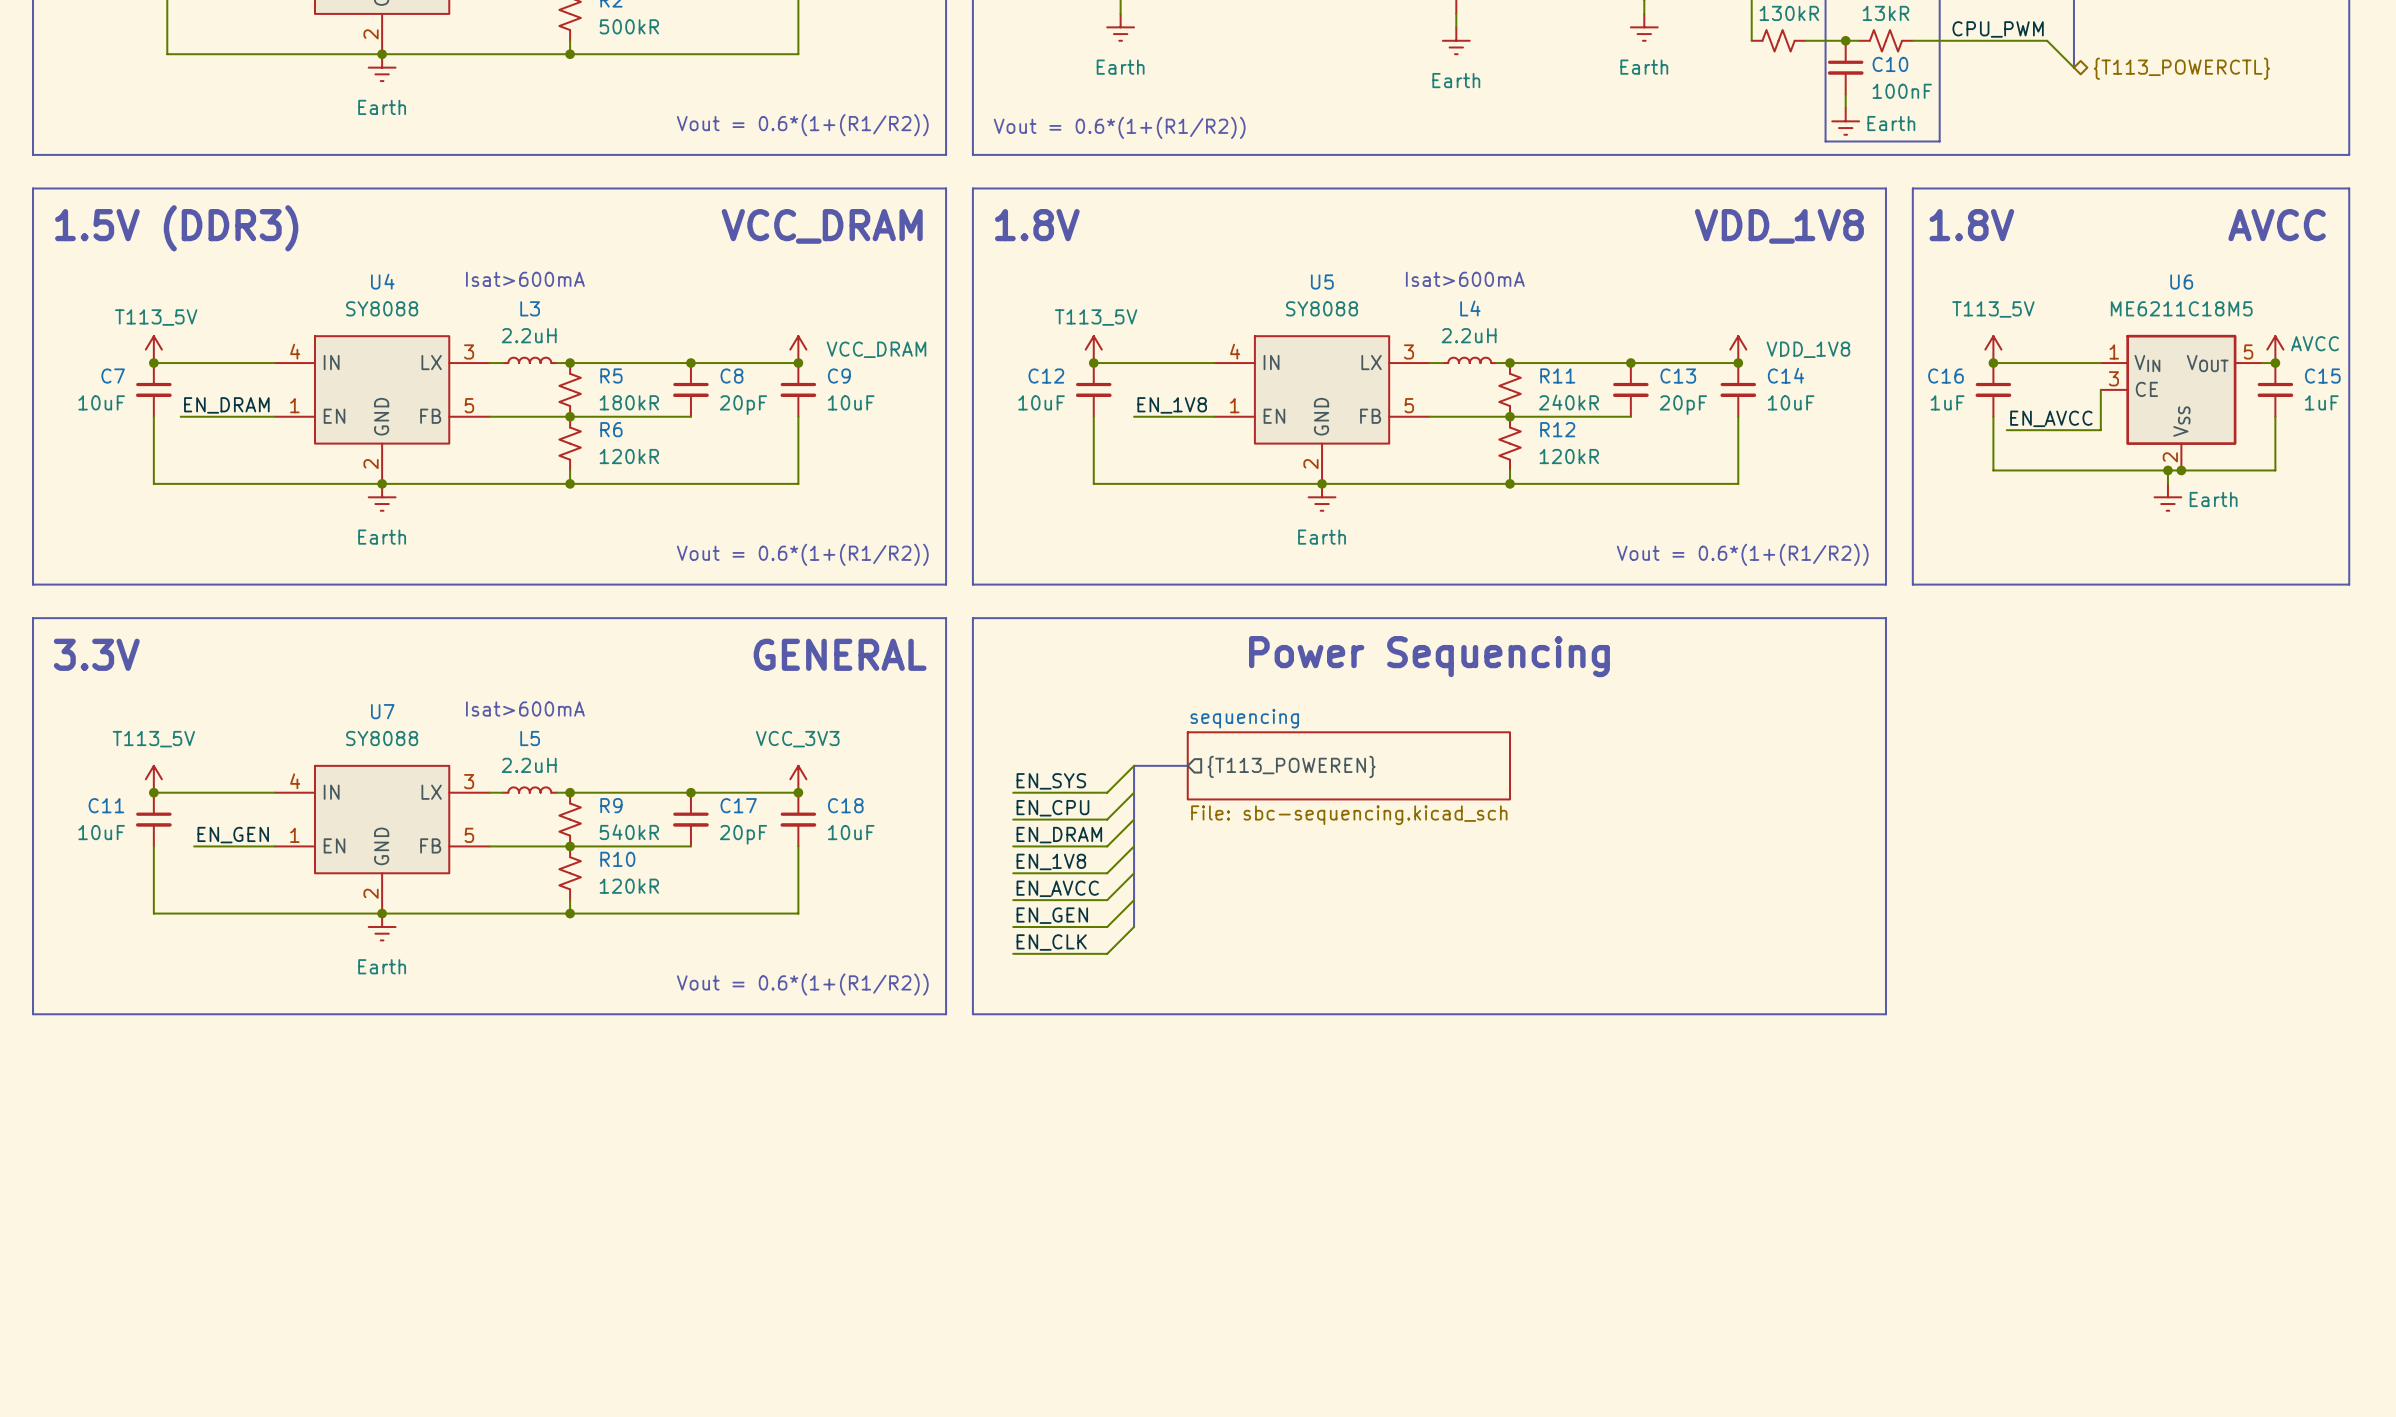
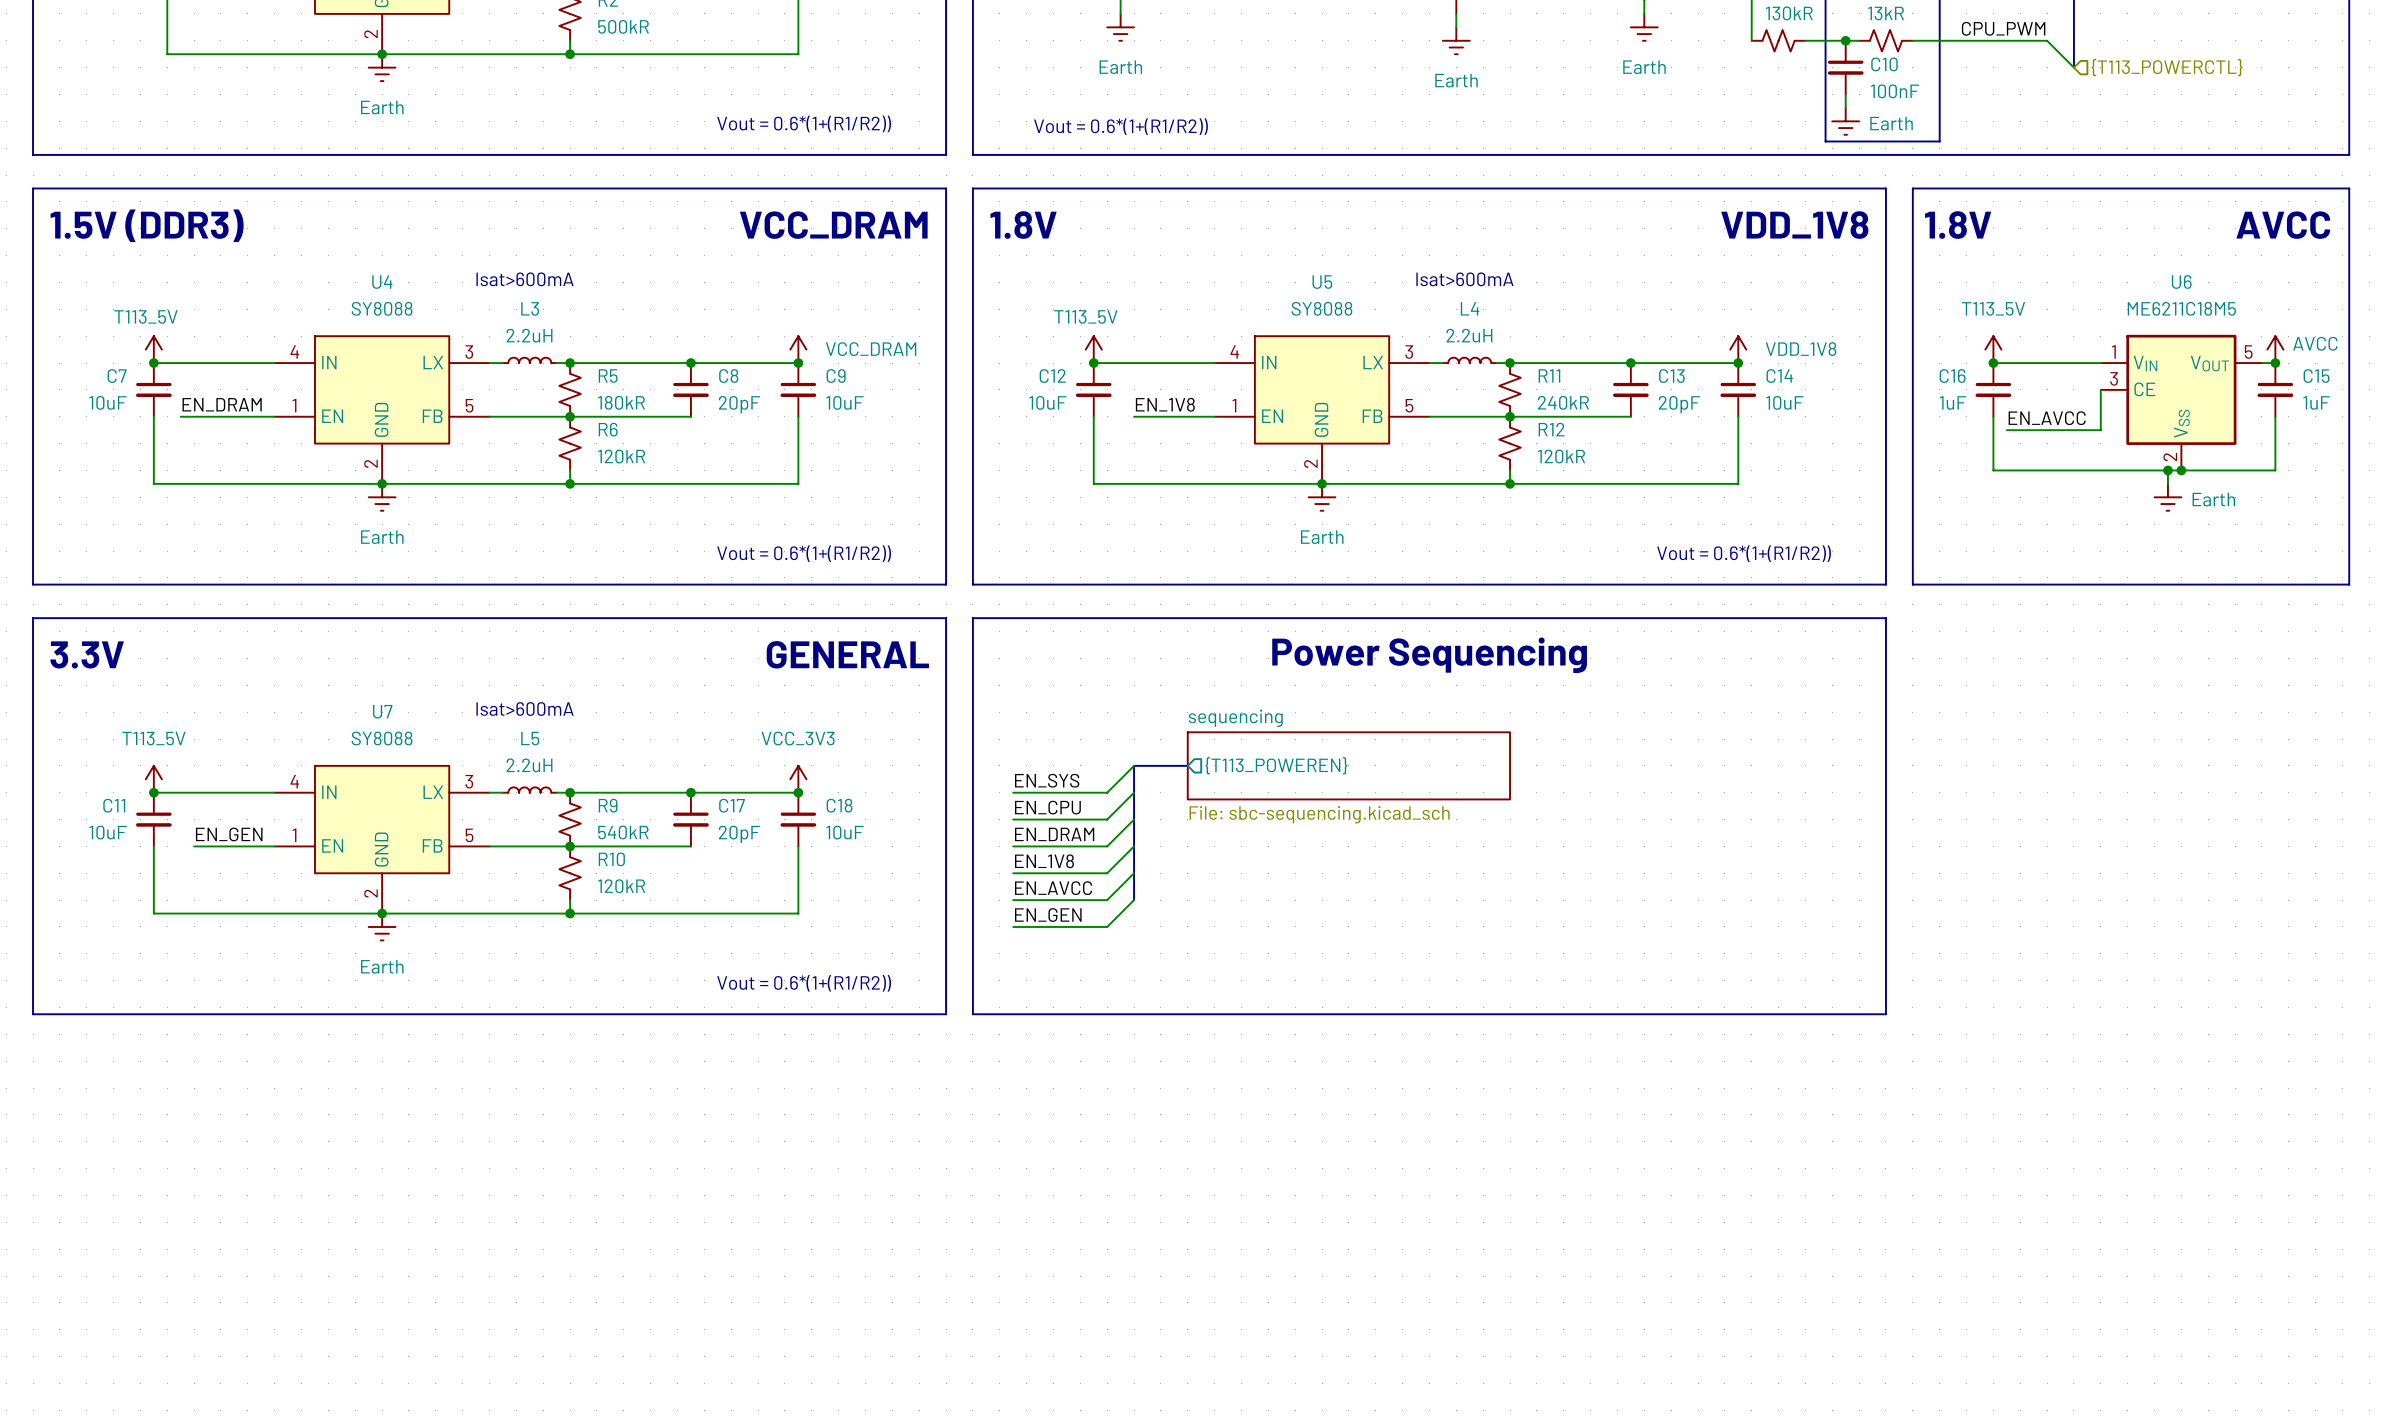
hierarchical label shape: bidirectional (2181, 68) -> input (2167, 67)
bus: (1134, 900) (1134, 926) -> none
wire: (1134, 926) (1107, 953) (1013, 953) -> none
label: EN_CLK (1051, 942) -> none

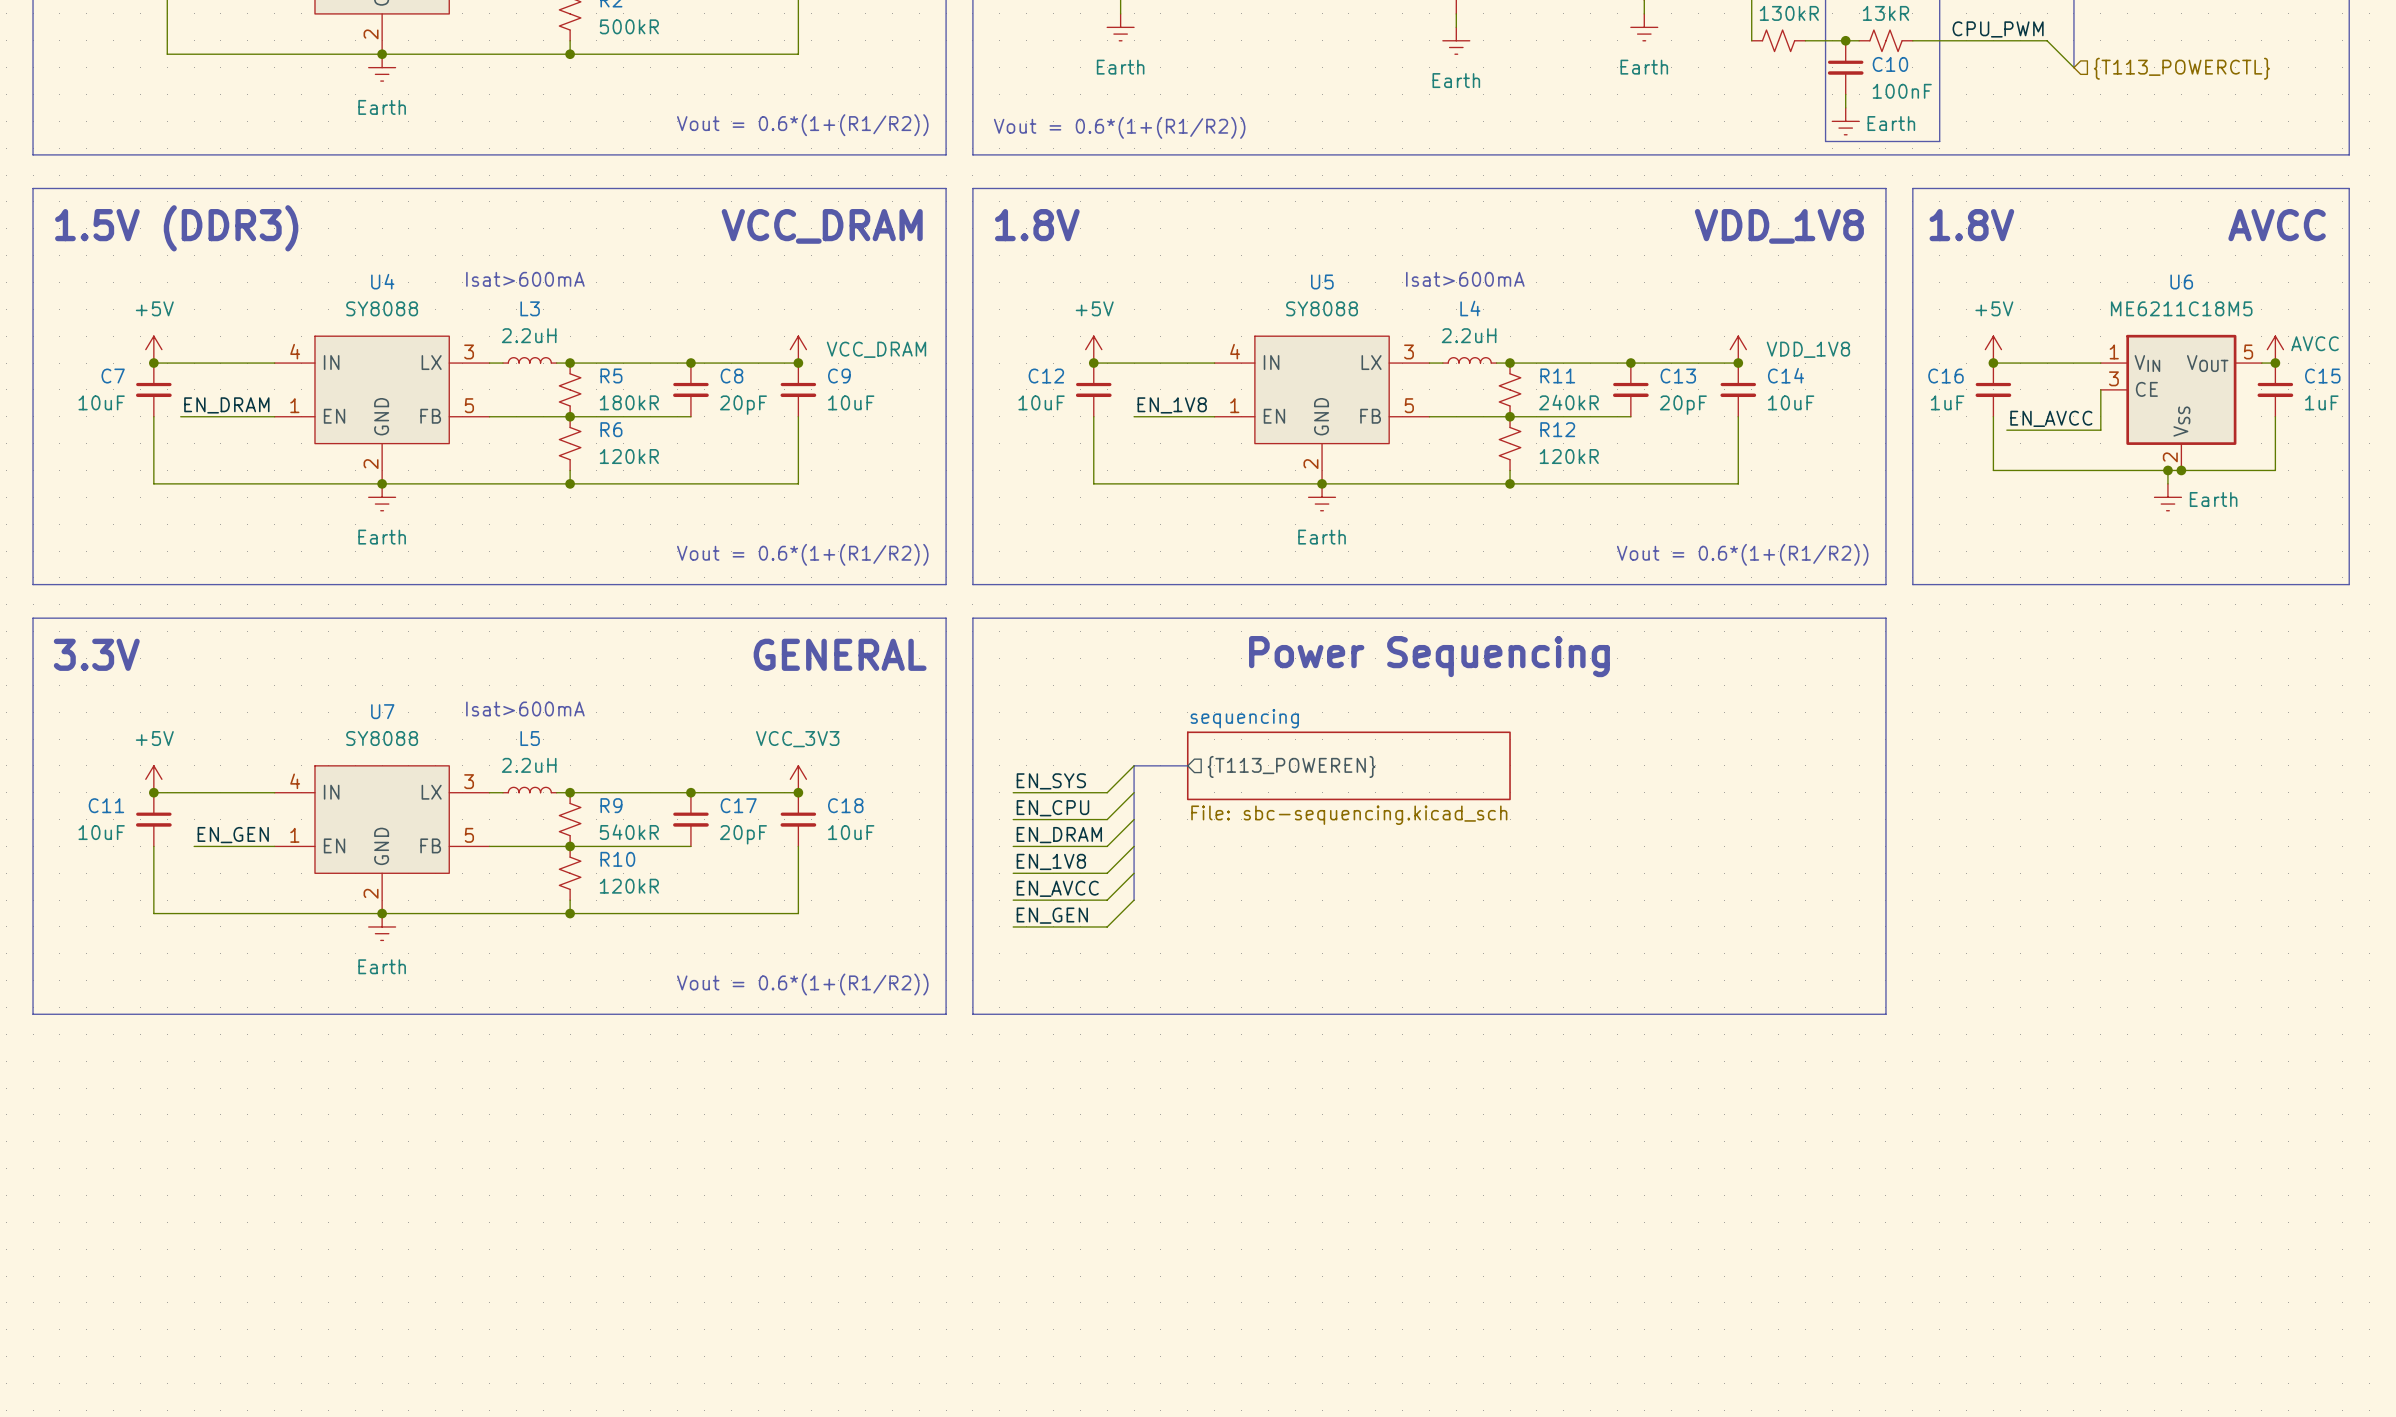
power symbol: T113_5V (153, 349) -> +5V (153, 349)
power symbol: T113_5V (1093, 349) -> +5V (1093, 349)
power symbol: T113_5V (1993, 349) -> +5V (1993, 349)
power symbol: T113_5V (153, 779) -> +5V (153, 779)

